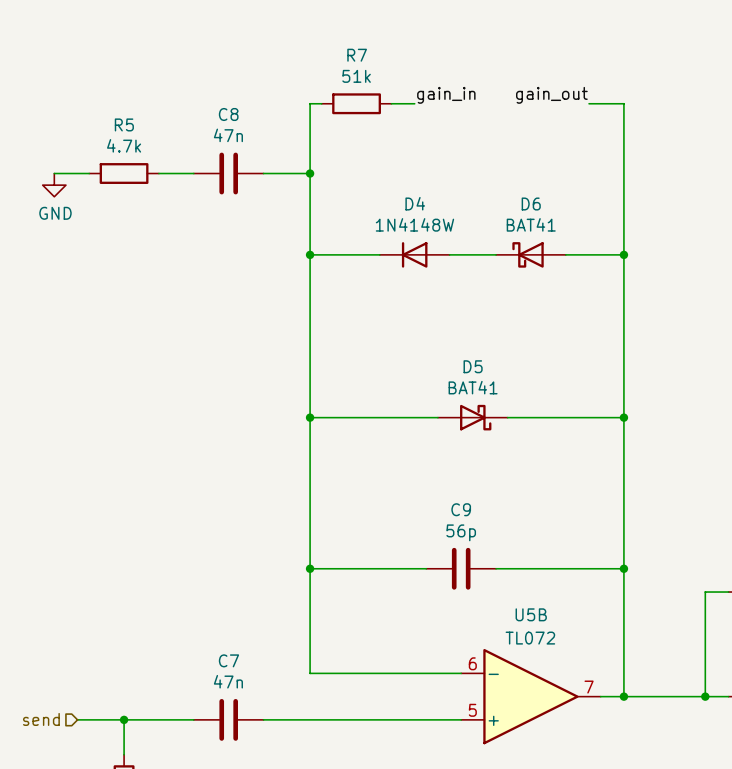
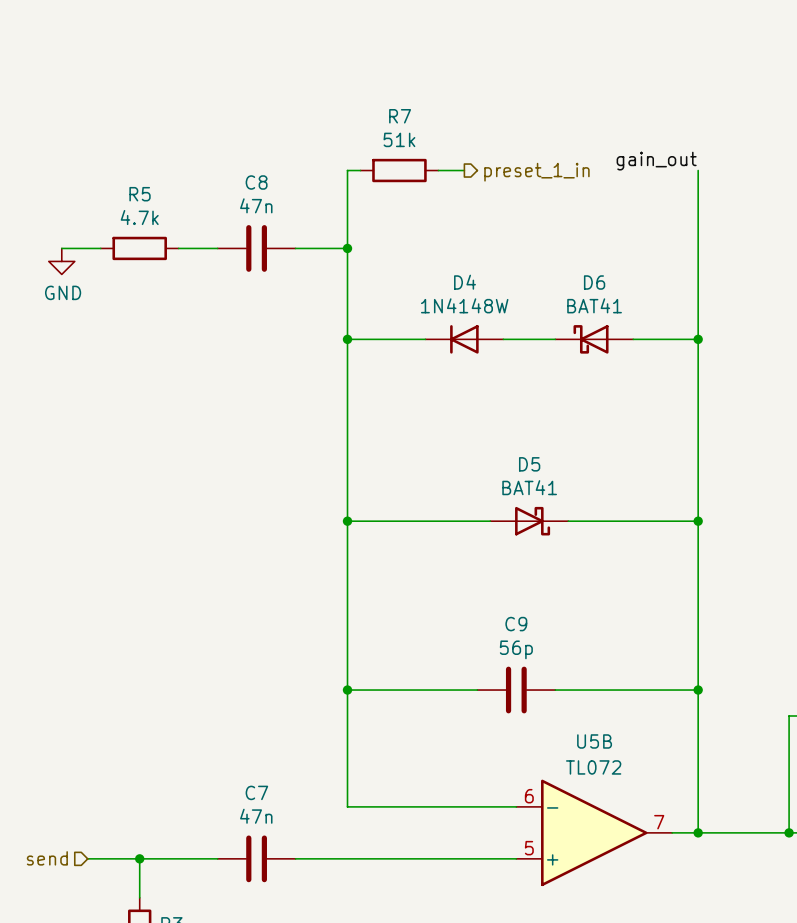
label: gain_in (446, 95) -> none
label position: gain_out (551, 95) -> gain_out (656, 161)
wire: (589, 103) (623, 103) -> none
hierarchical label: none -> preset_1_in (536, 172)

